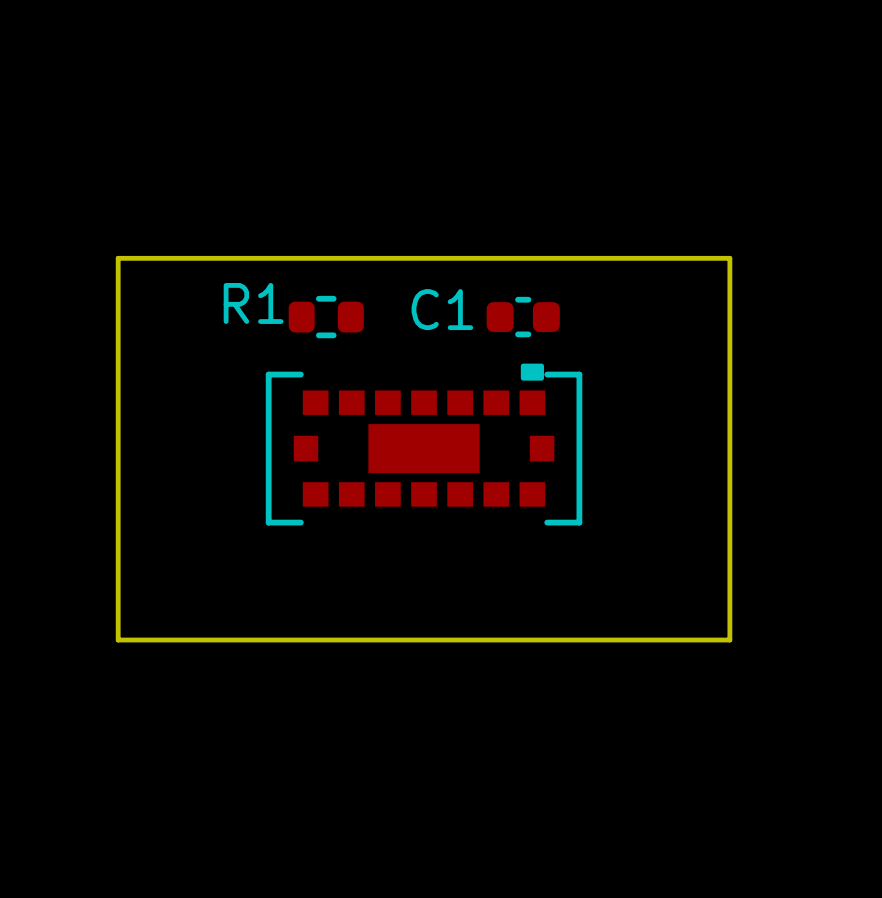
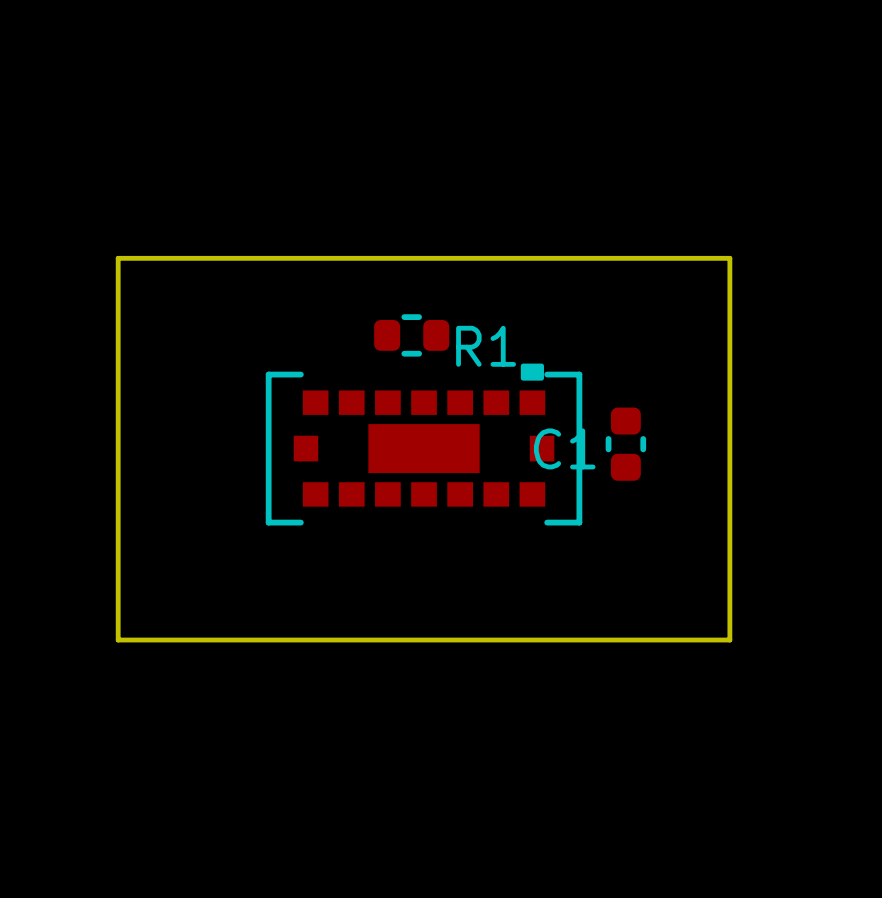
R1 name position: R1 (253, 303) -> R1 (486, 346)
R1 position: (326, 317) -> (411, 335)
C1 rotation: 0° (523, 317) -> 90° clockwise (625, 444)
C1 position: (523, 317) -> (625, 444)

